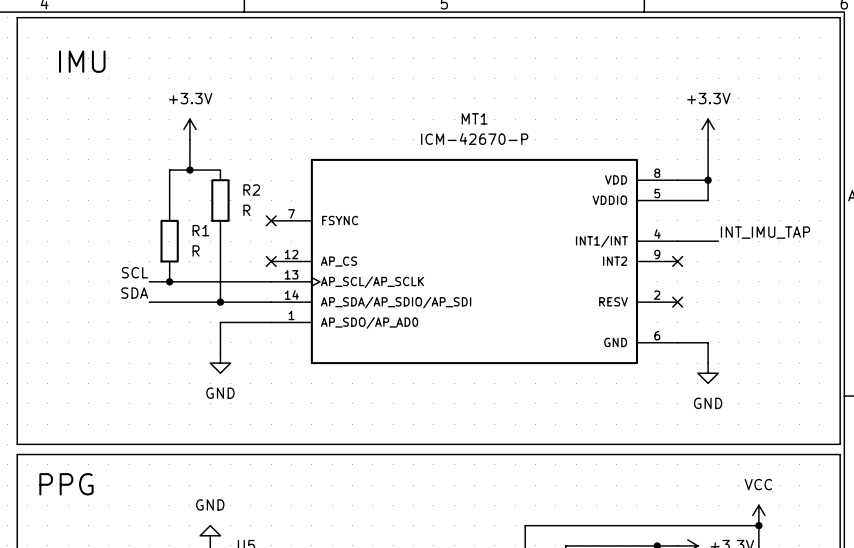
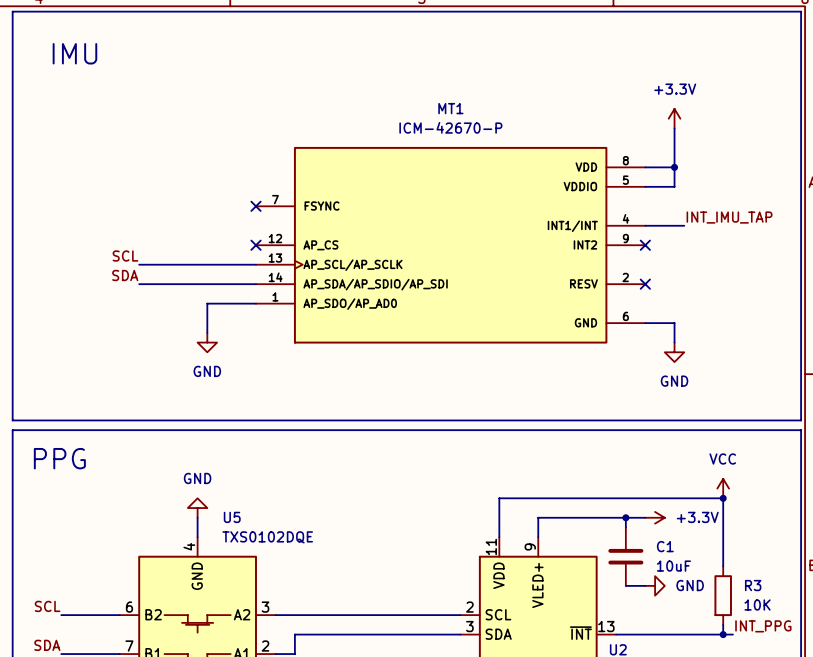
power symbol: +3.3V (189, 129) -> none
wire: (189, 139) (189, 170) -> none
junction: (189, 170) -> none
wire: (220, 170) (169, 170) (169, 210) -> none
R2: R (220, 200) -> none
wire: (220, 231) (220, 302) -> none
R1: R (169, 241) -> none
wire: (169, 271) (169, 281) -> none
junction: (169, 281) -> none
junction: (220, 302) -> none

